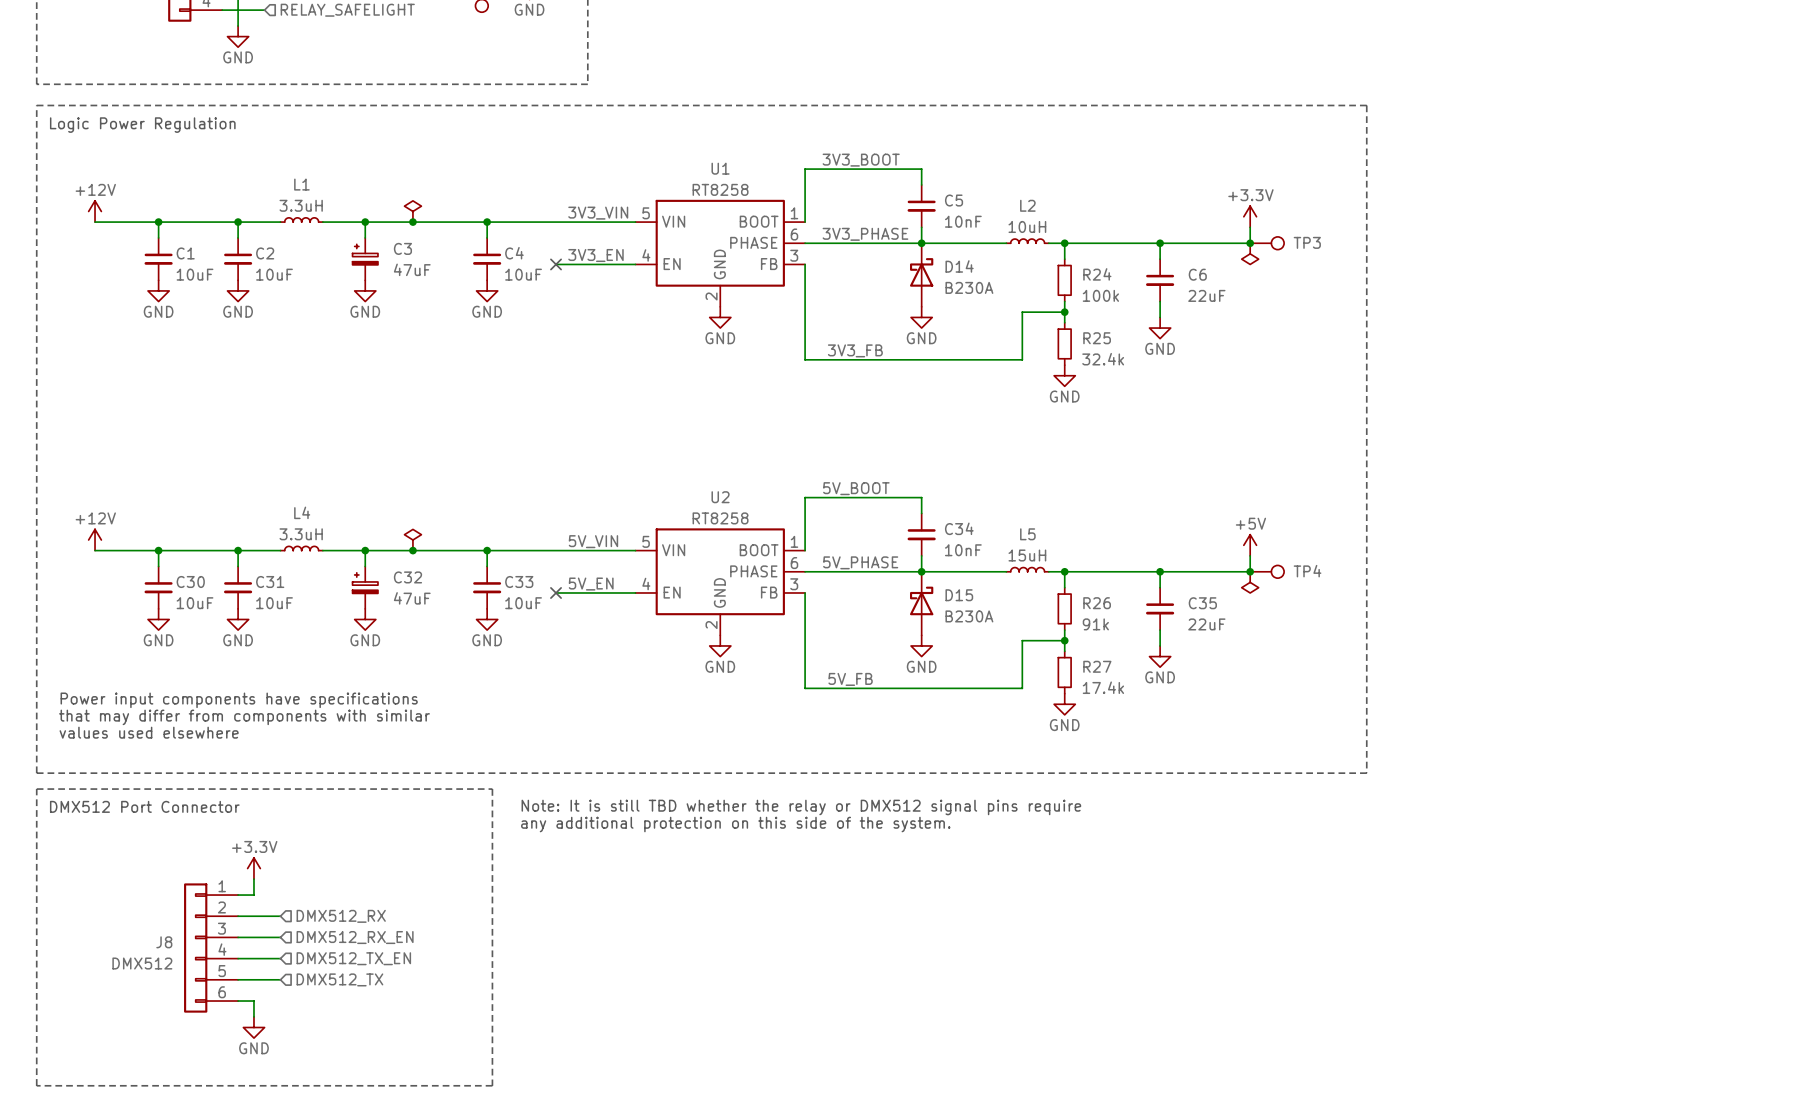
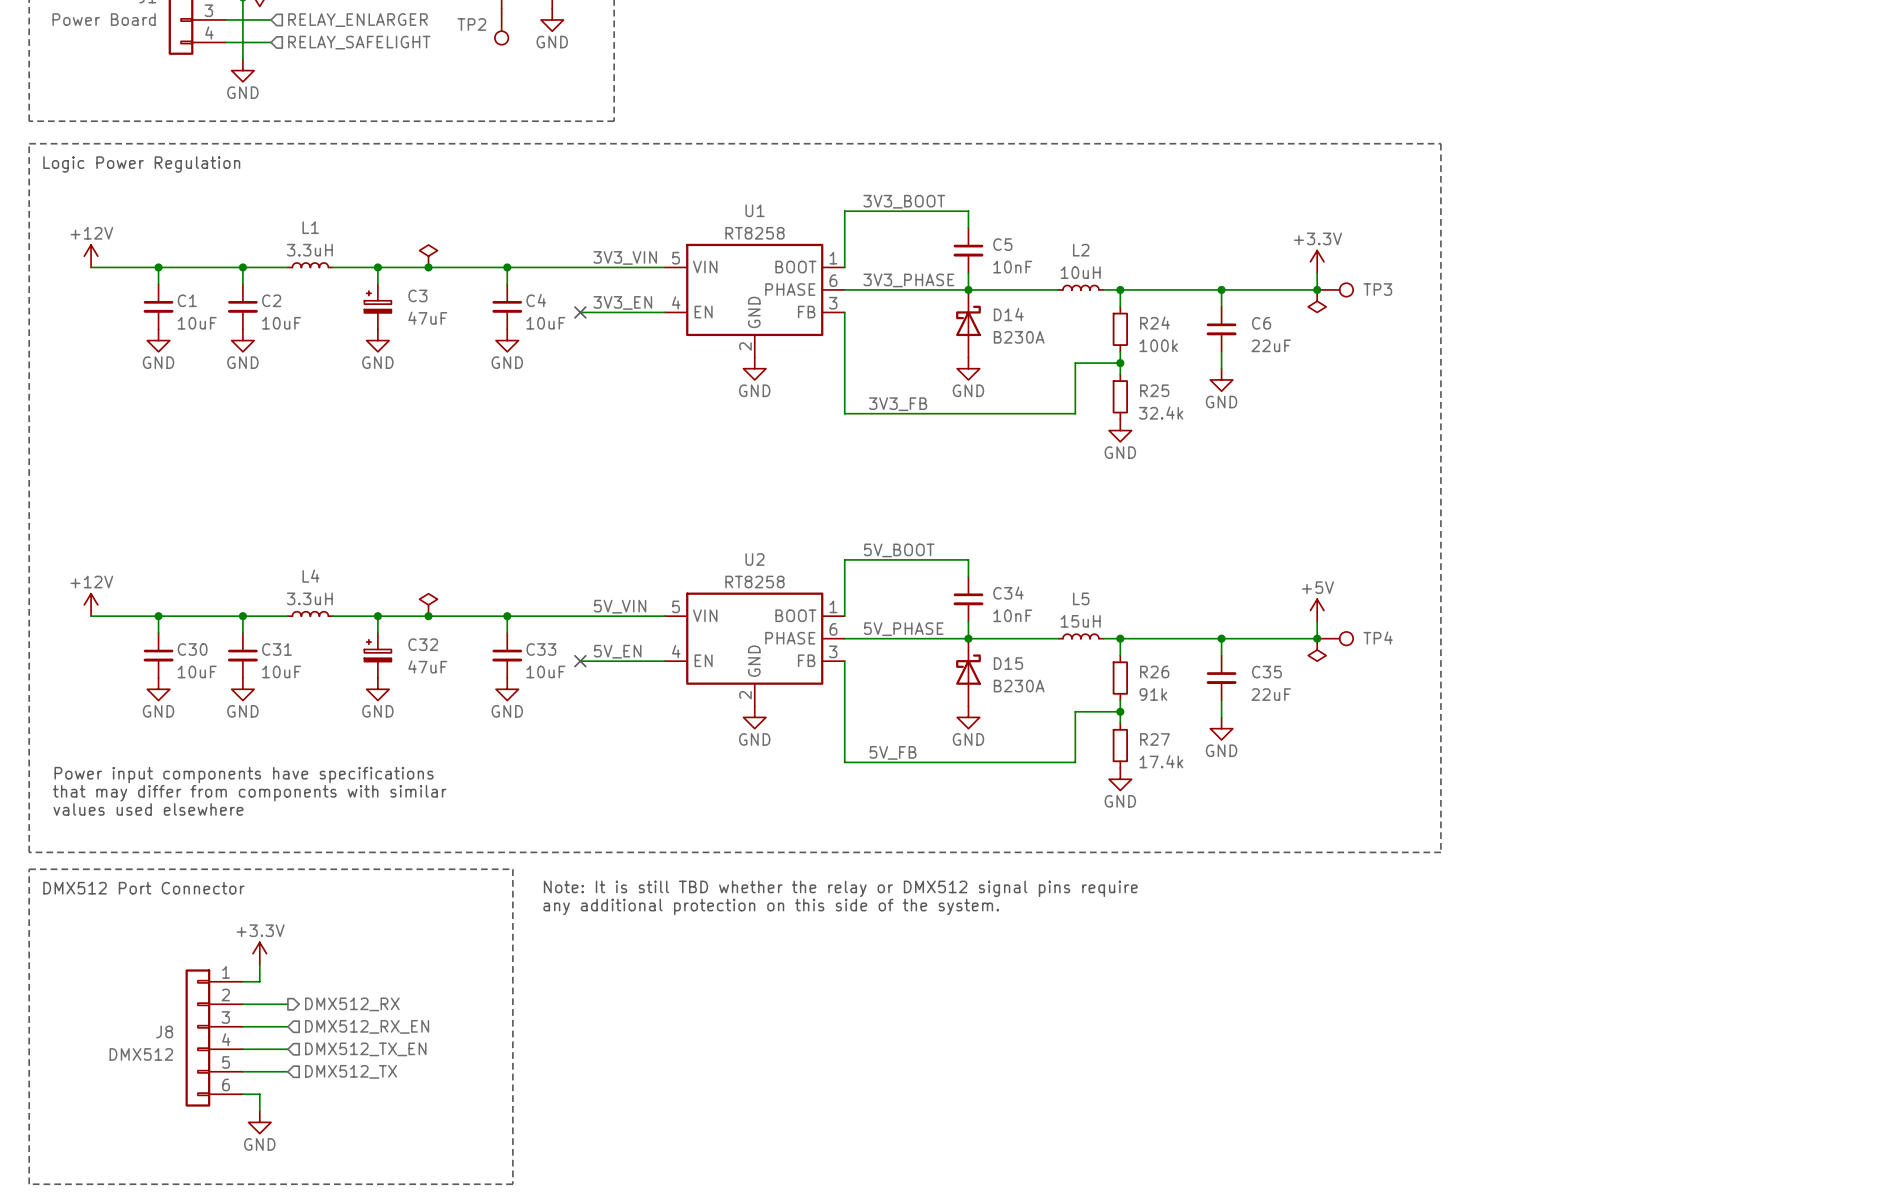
hierarchical label shape: input (341, 916) -> output (352, 1004)

